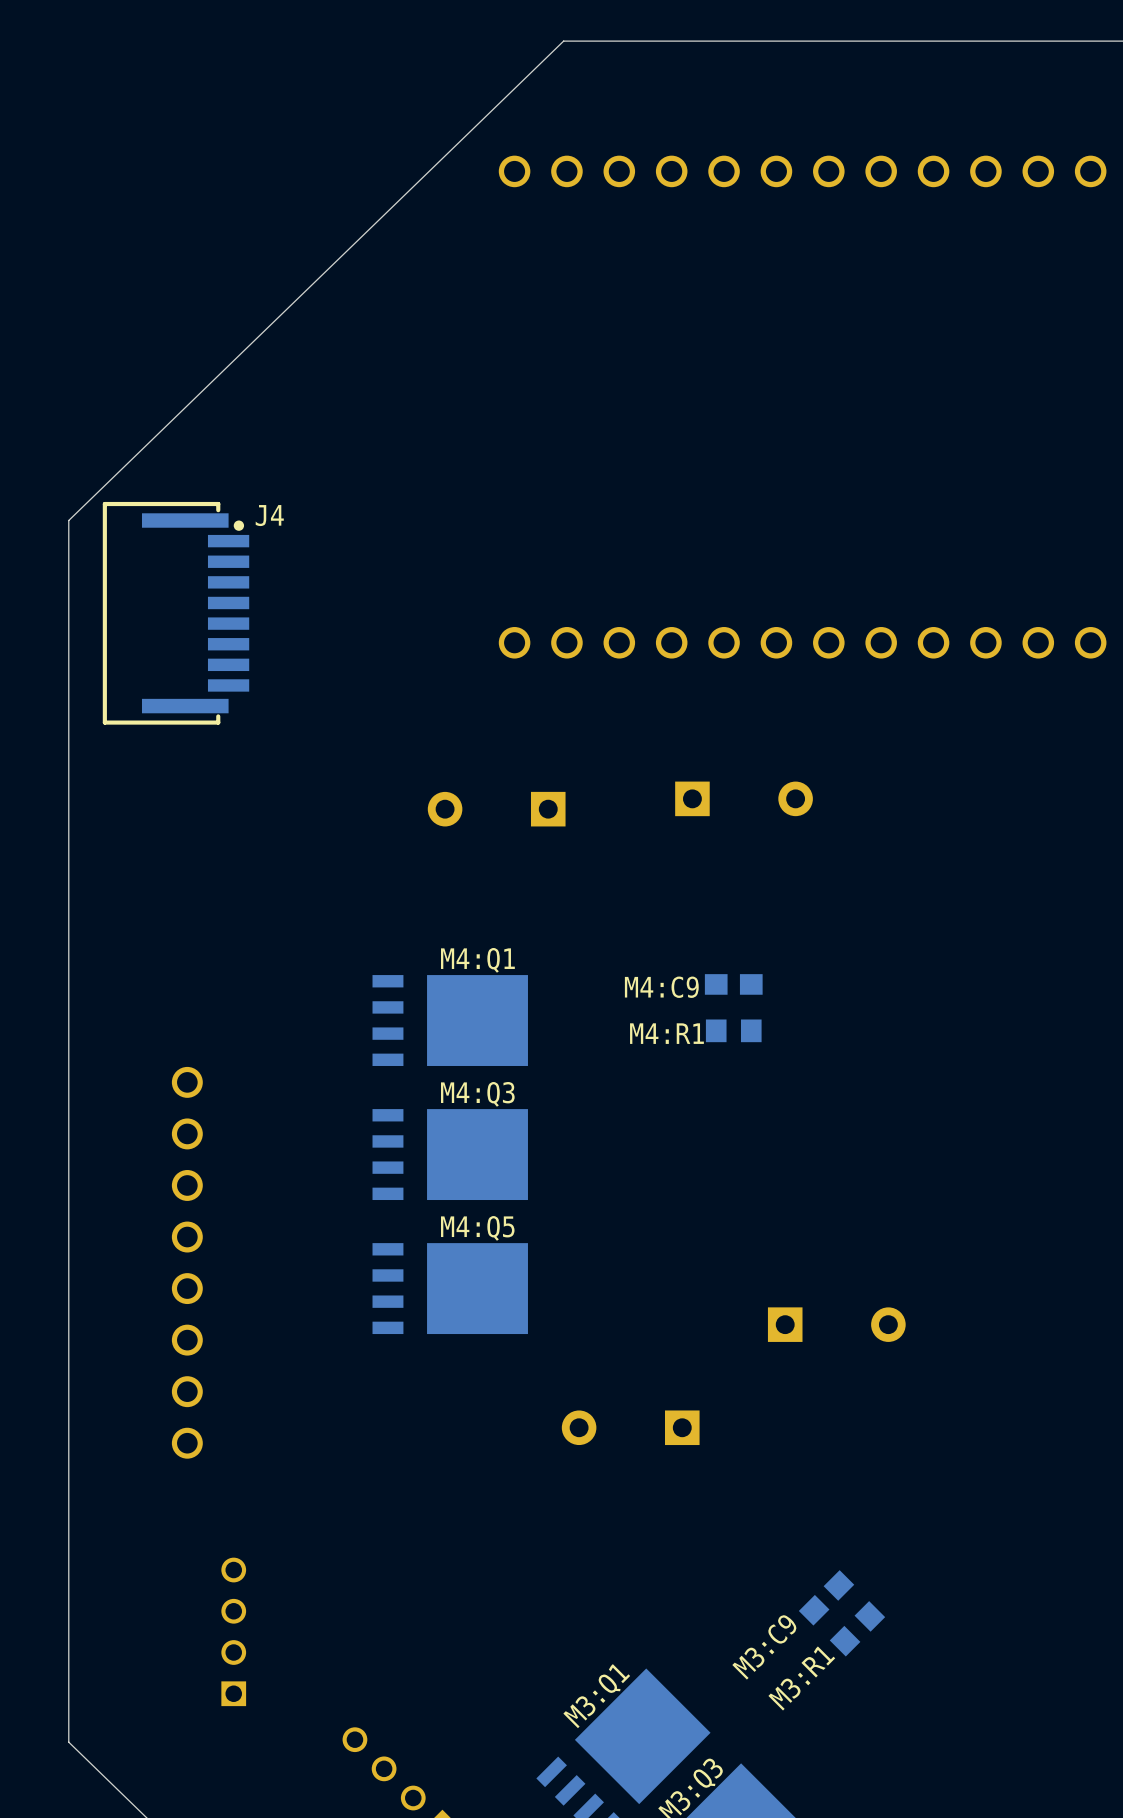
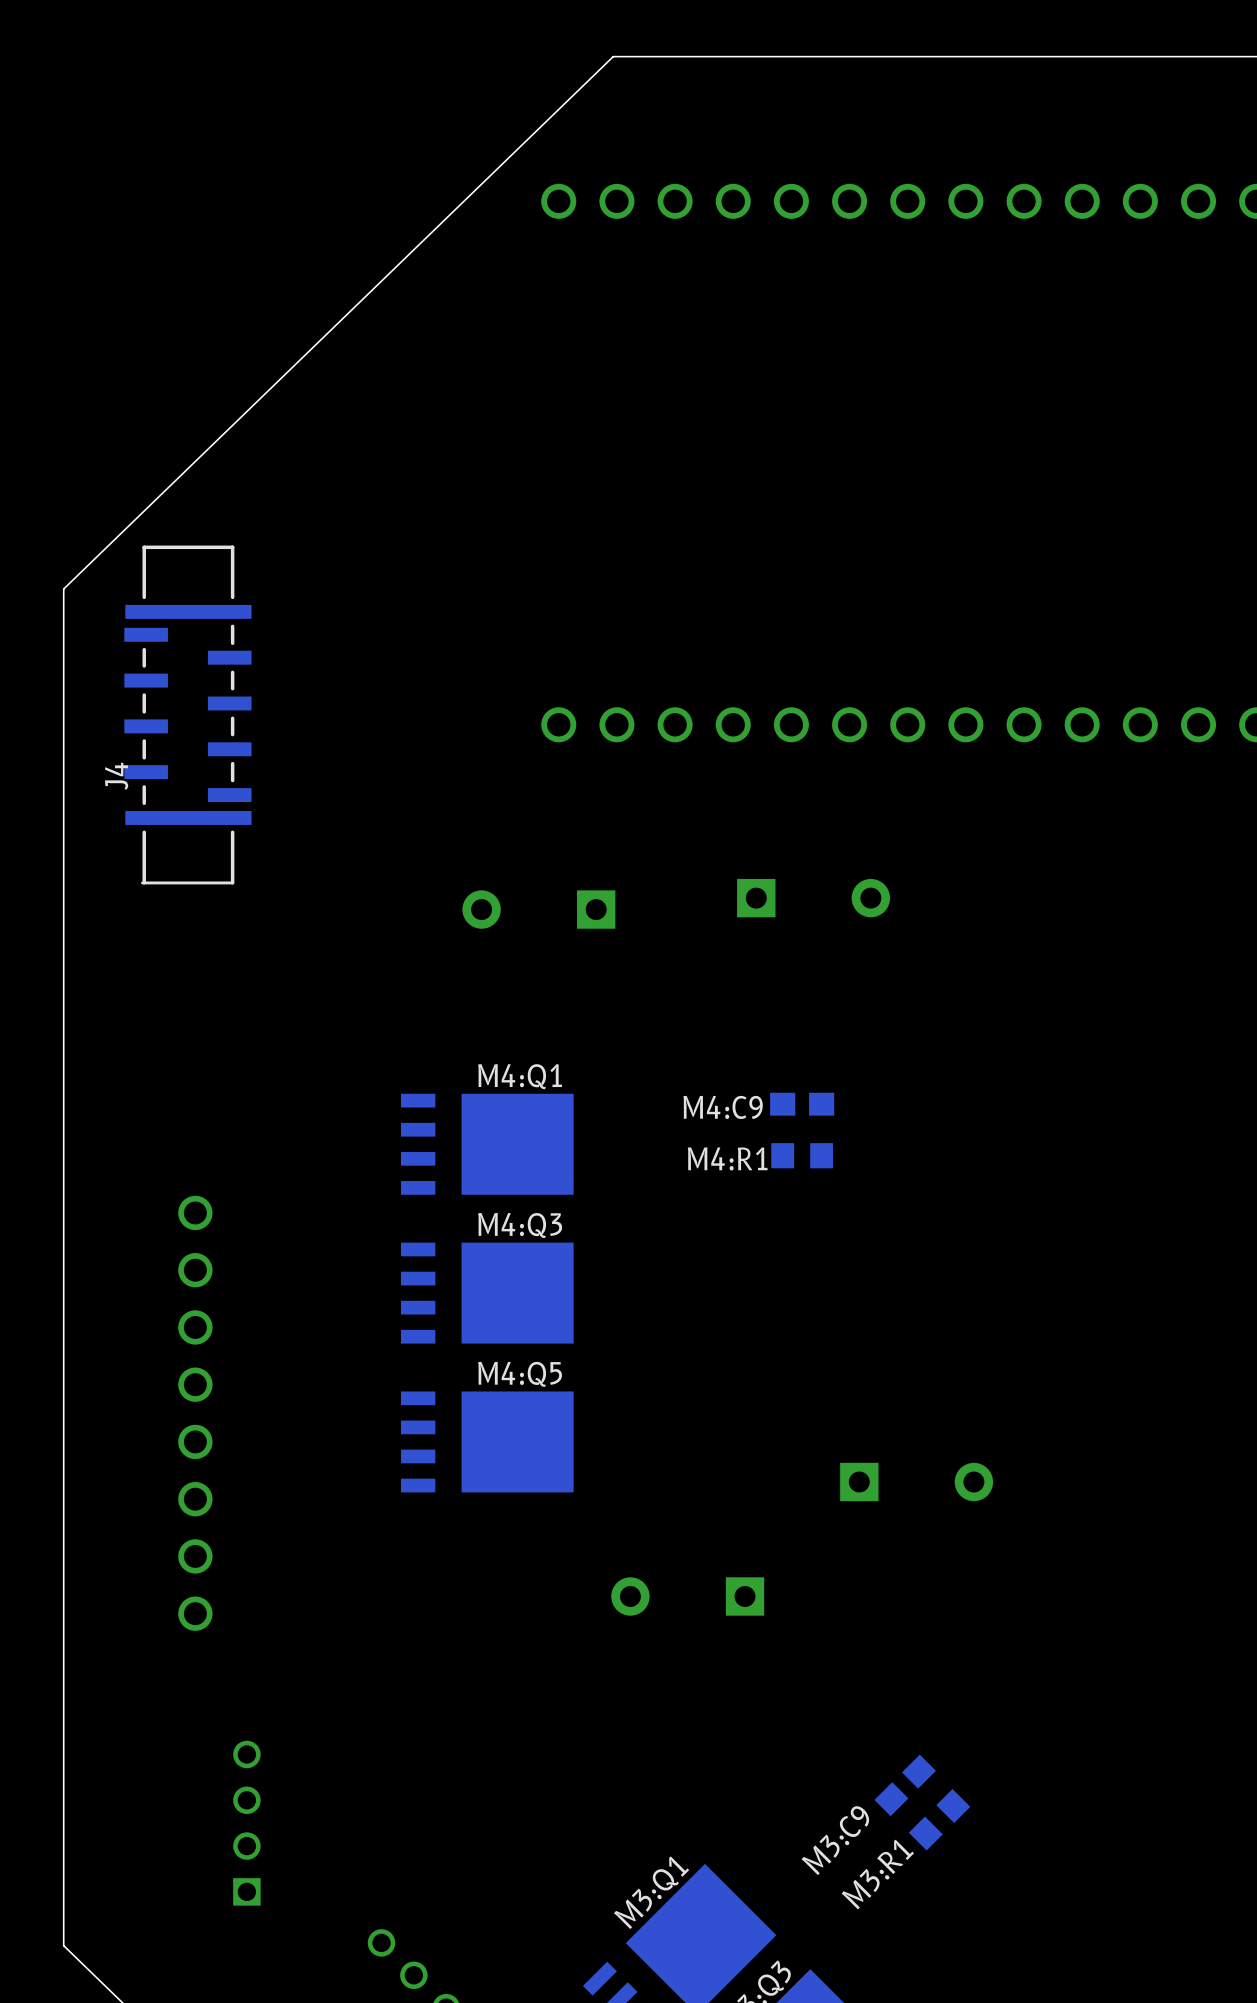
J4 footprint: [102, 501, 250, 725] -> [124, 545, 252, 885]
J4 name position: J4 (269, 515) -> J4 (116, 776)

